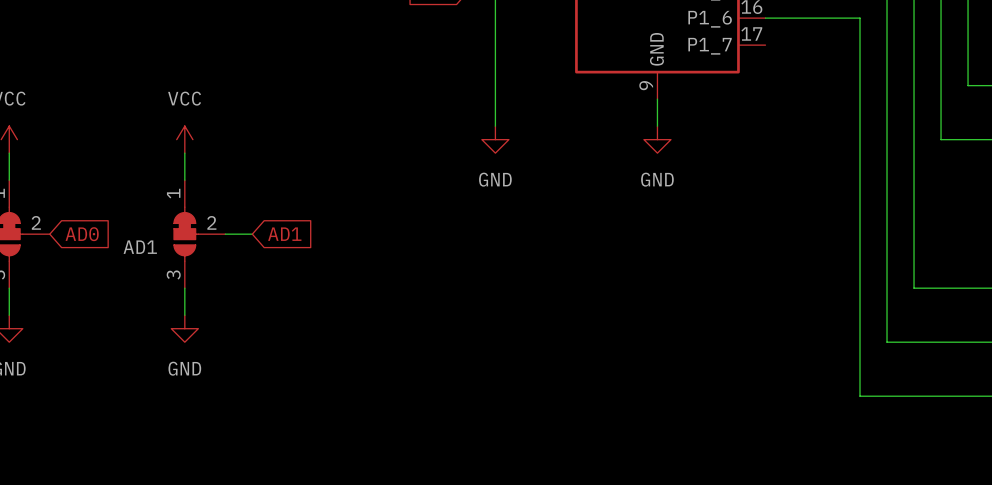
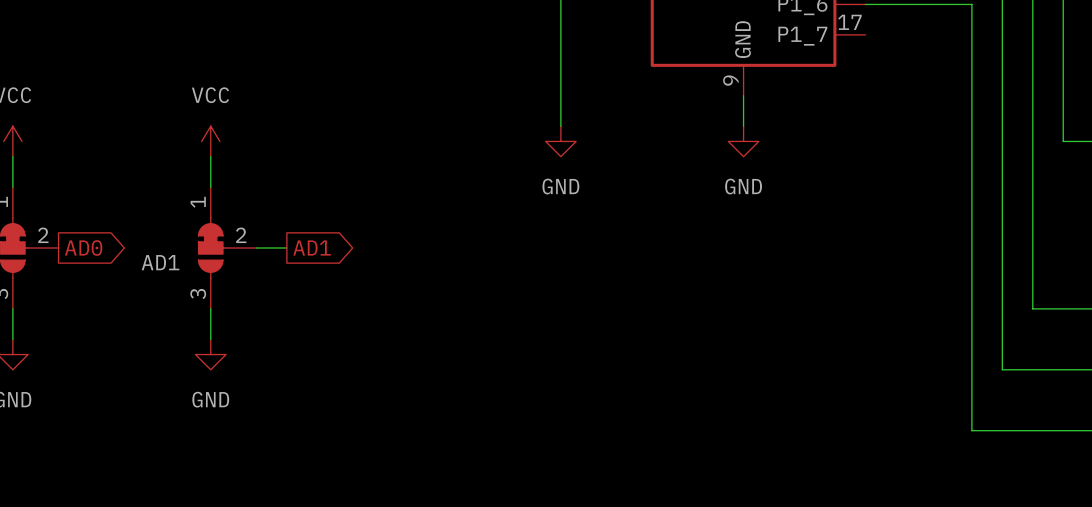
global label shape: input (82, 234) -> output (83, 248)
global label shape: input (284, 234) -> output (312, 248)

